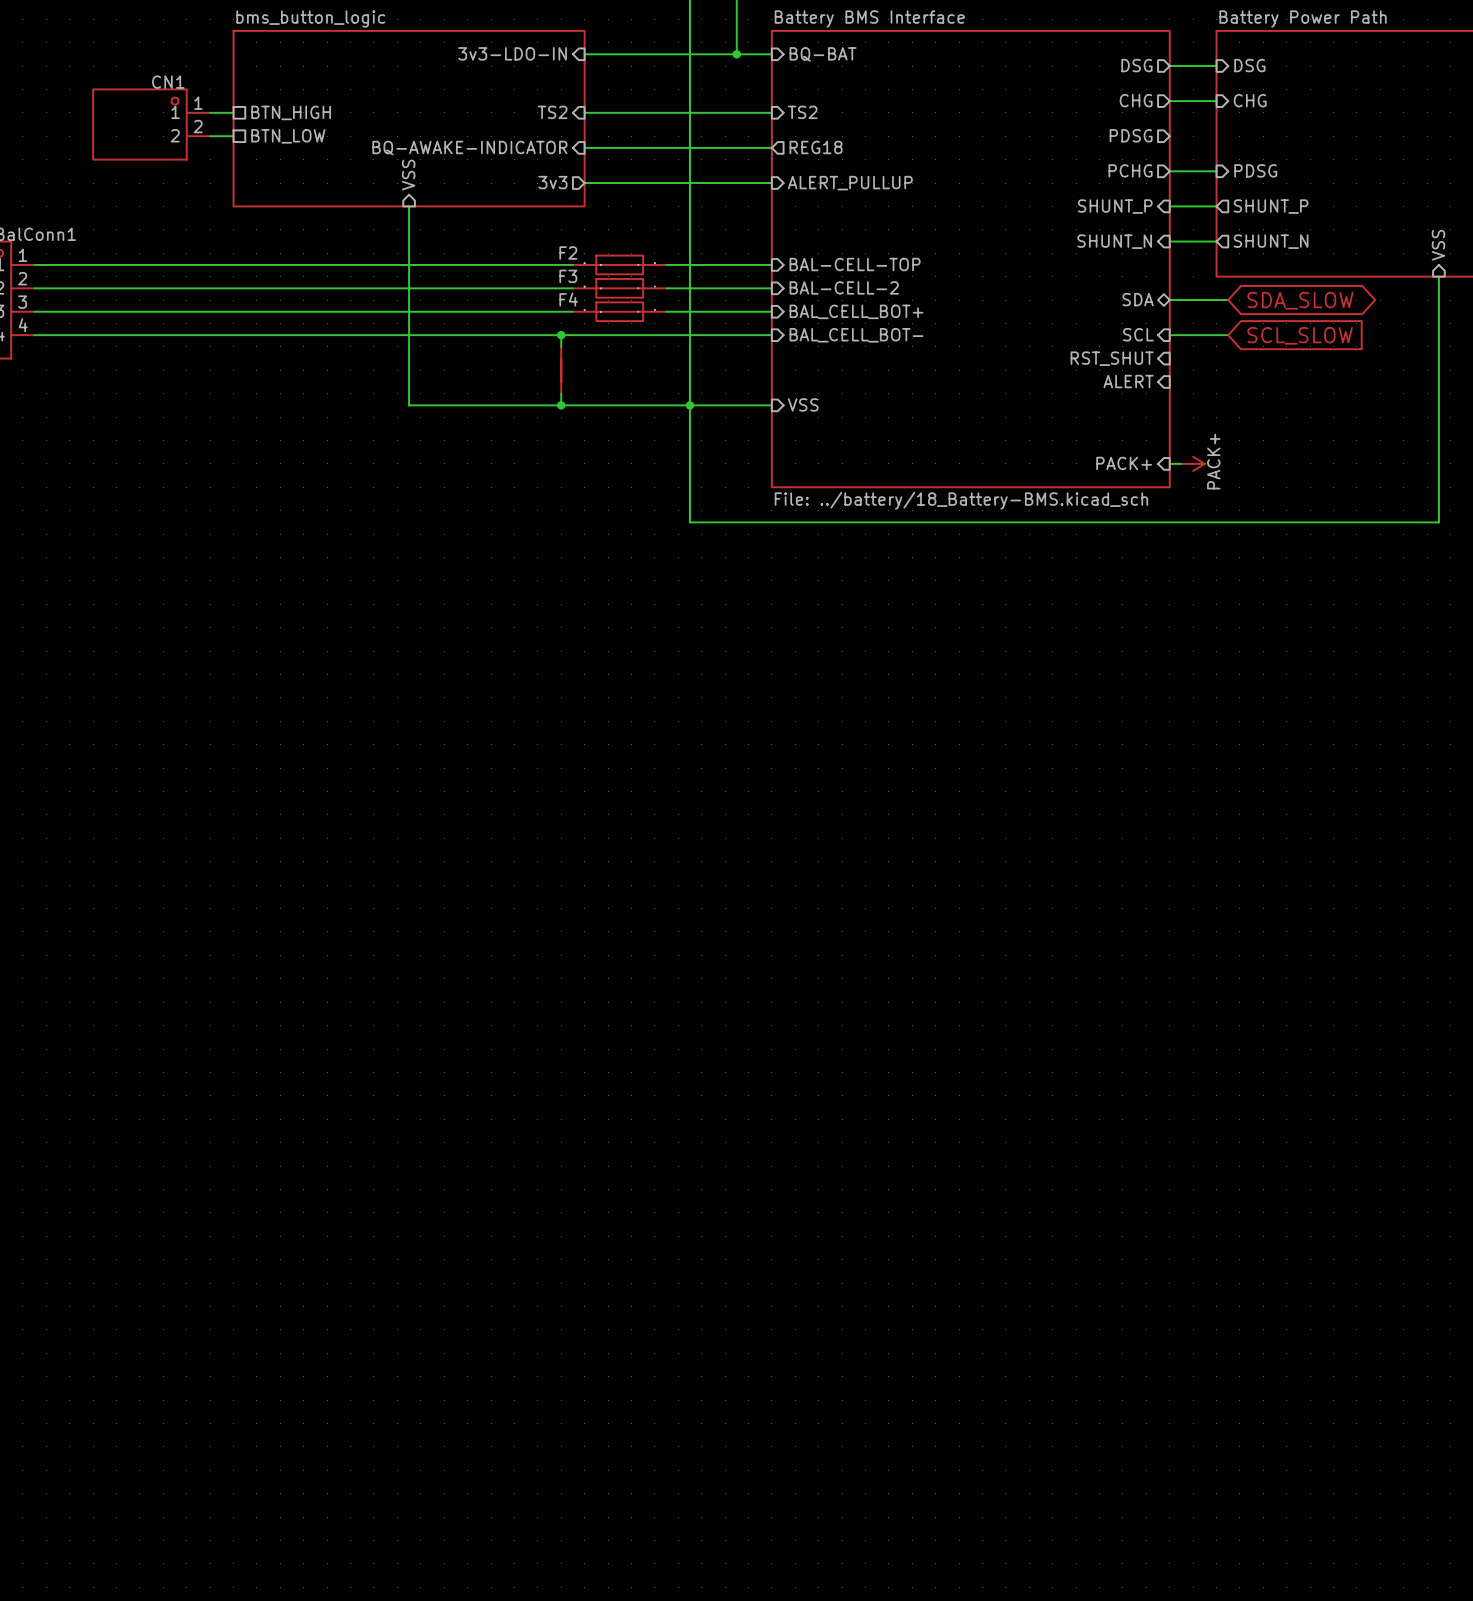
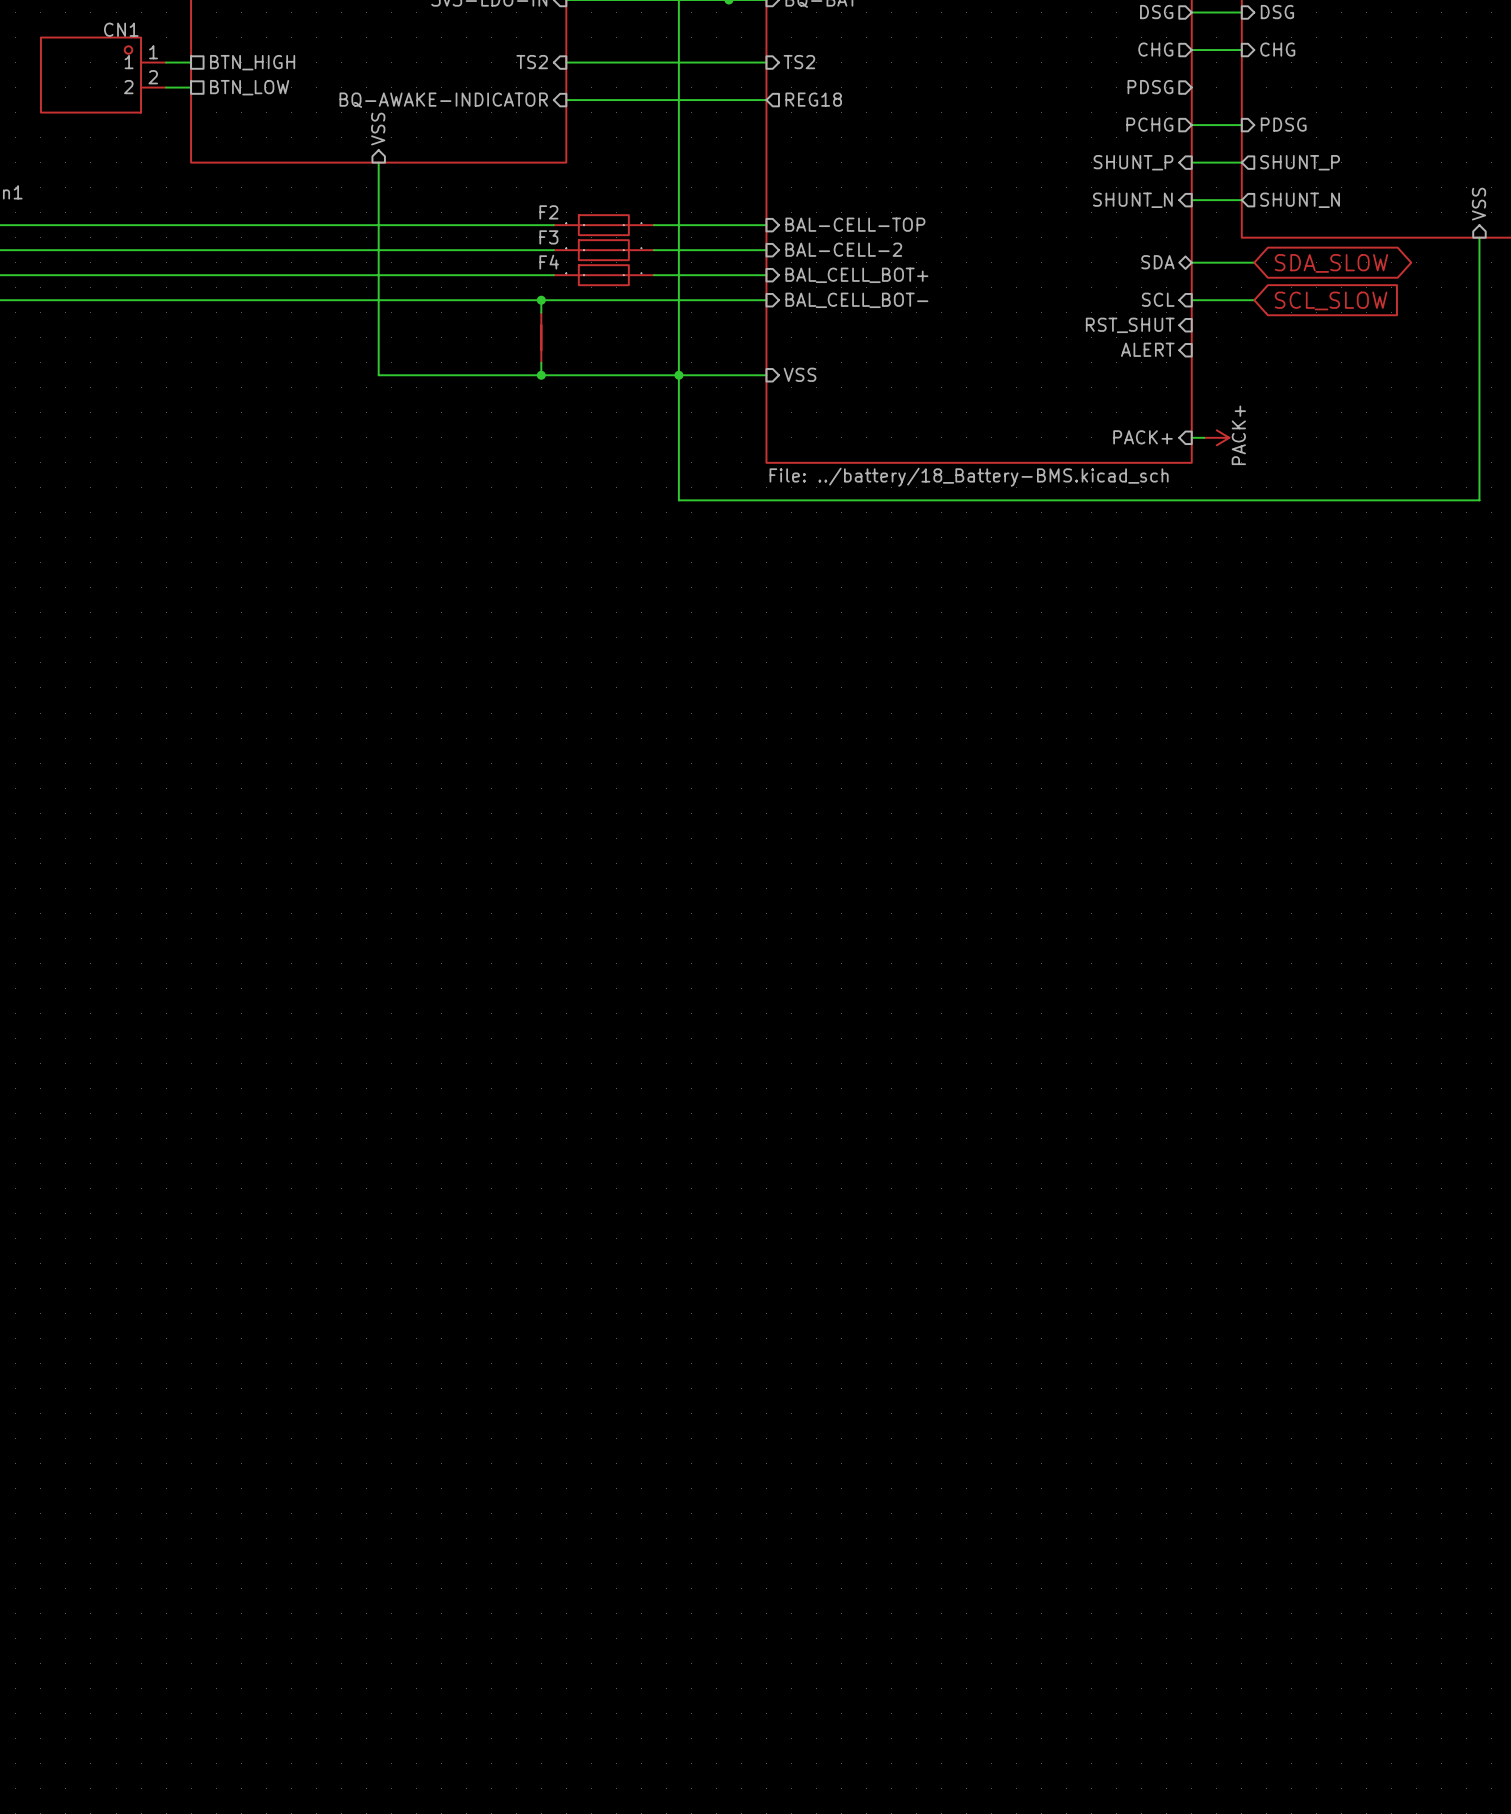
sheet pin: 3v3 (552, 182) -> none
wire: (584, 183) (771, 183) -> none
sheet pin: ALERT_PULLUP (850, 183) -> none

